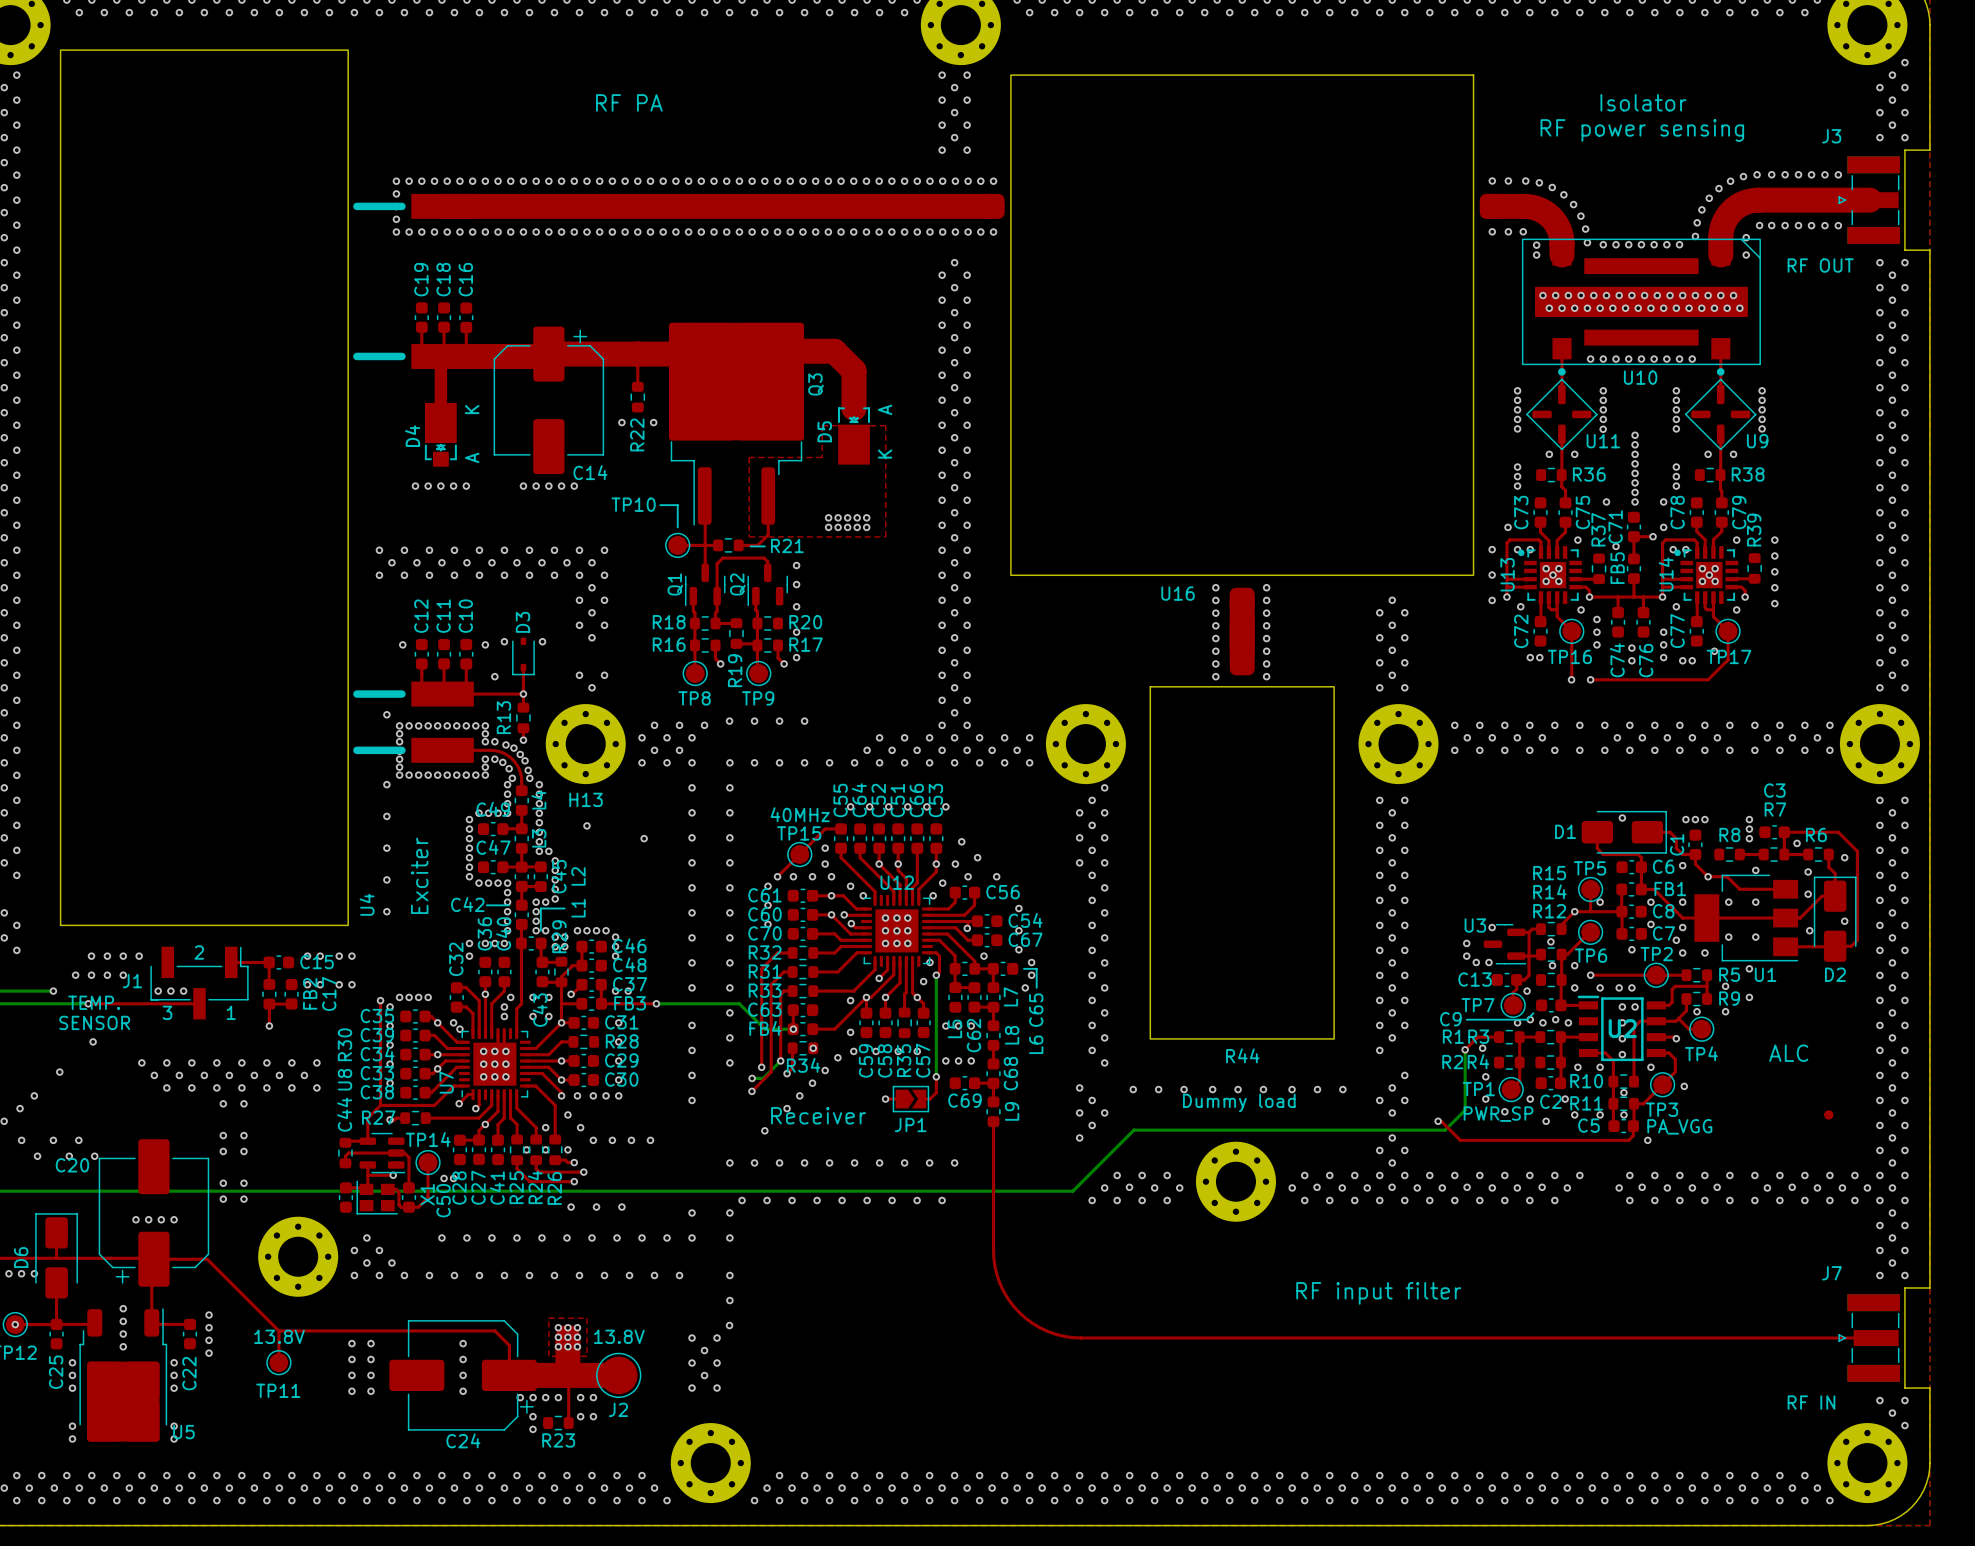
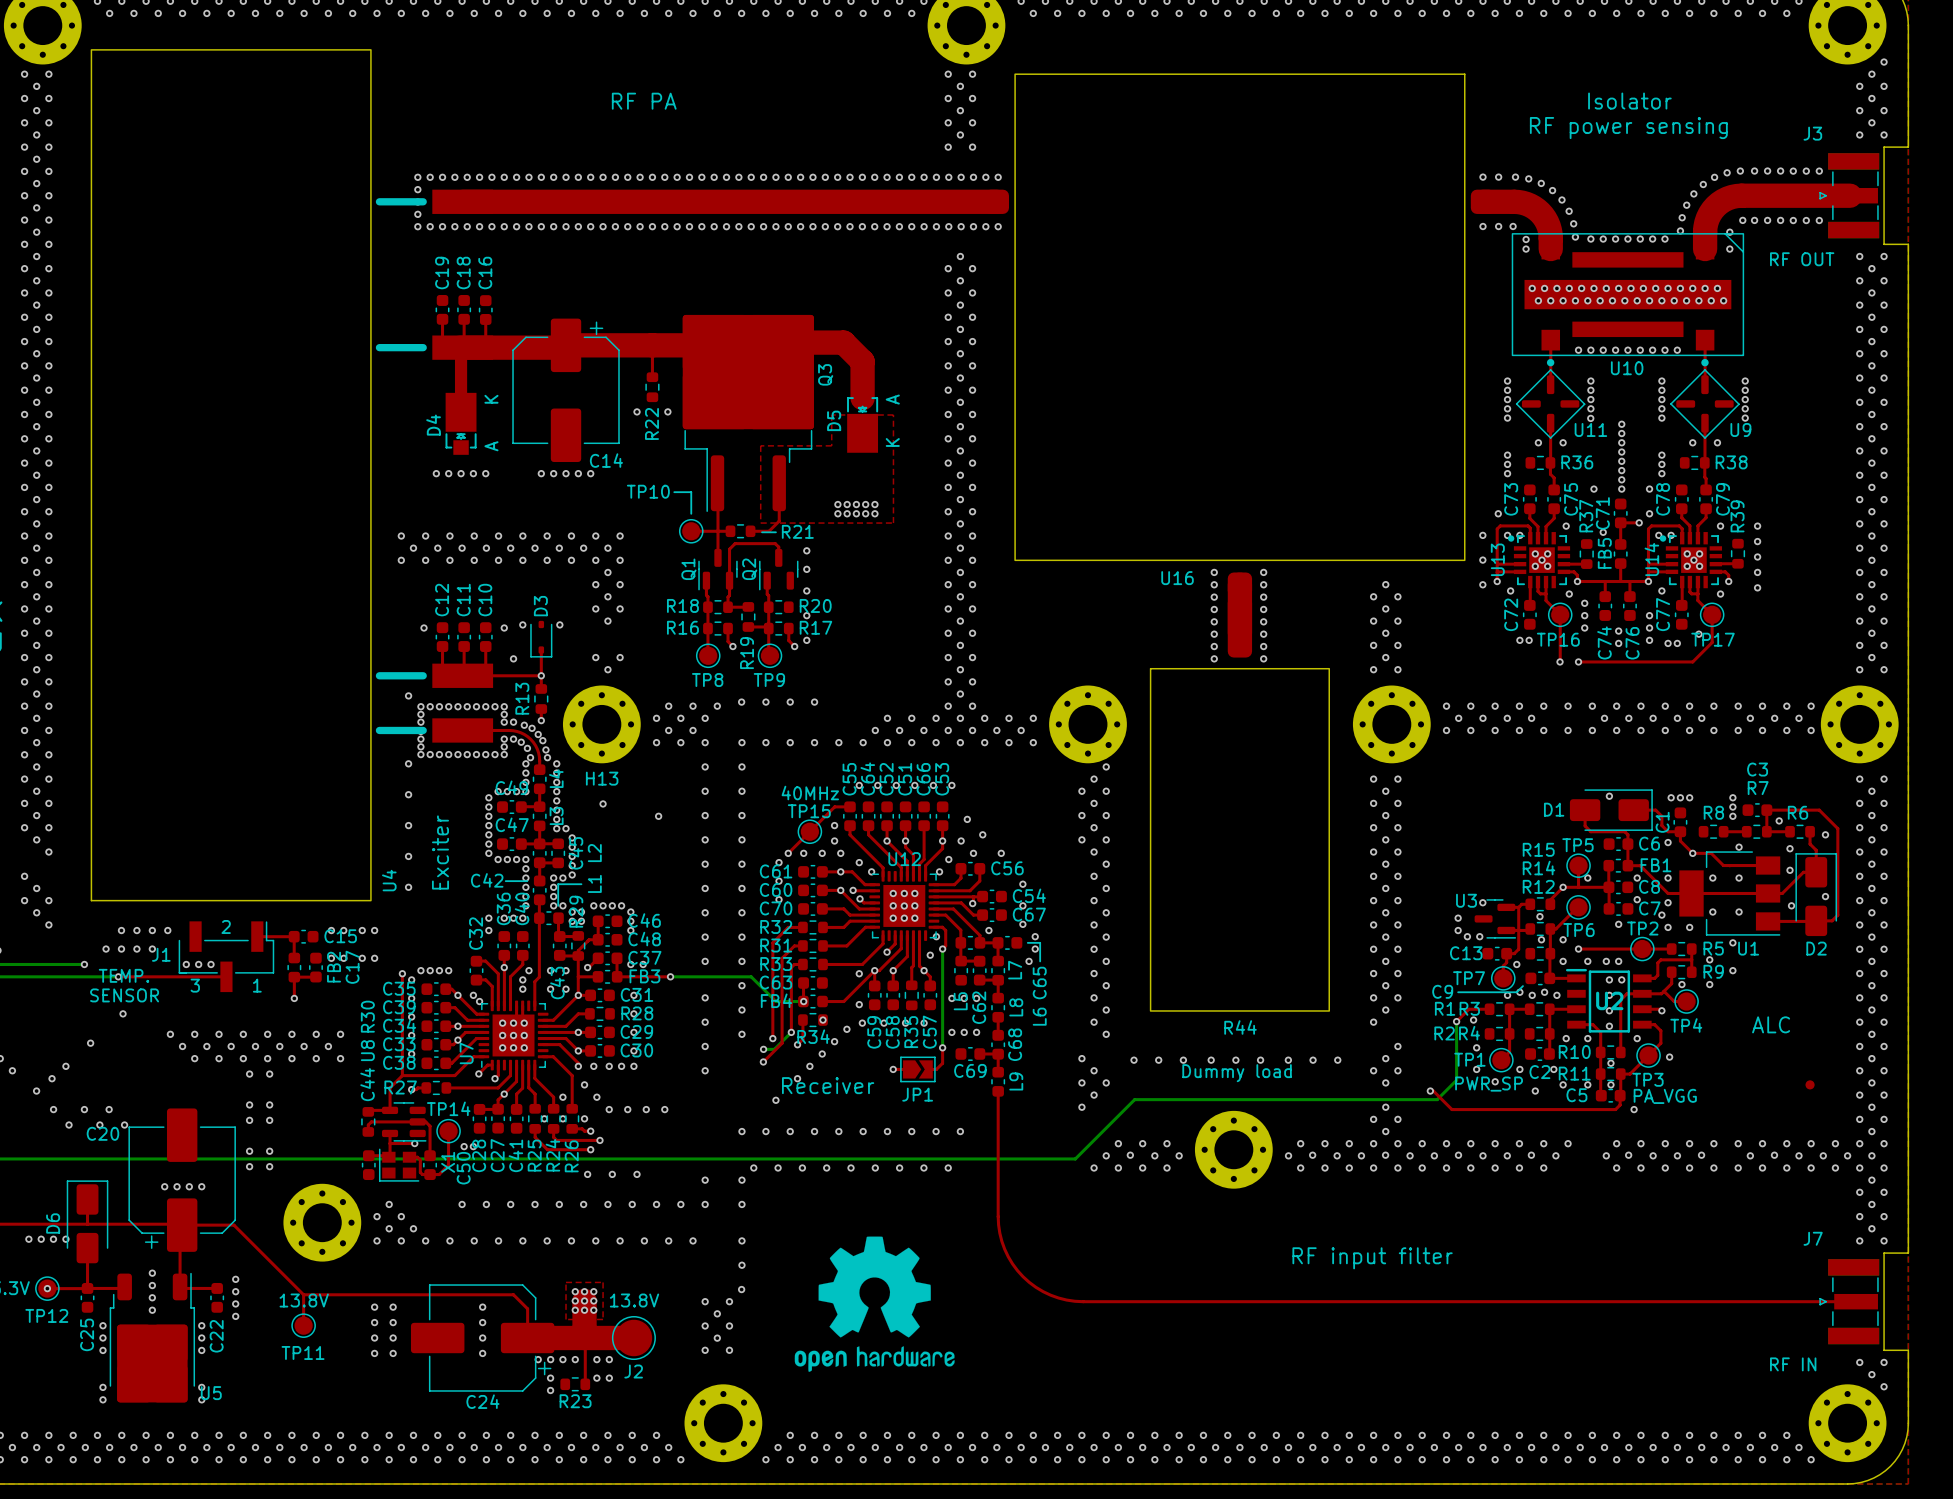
drawing: none -> [794, 1236, 955, 1372]

